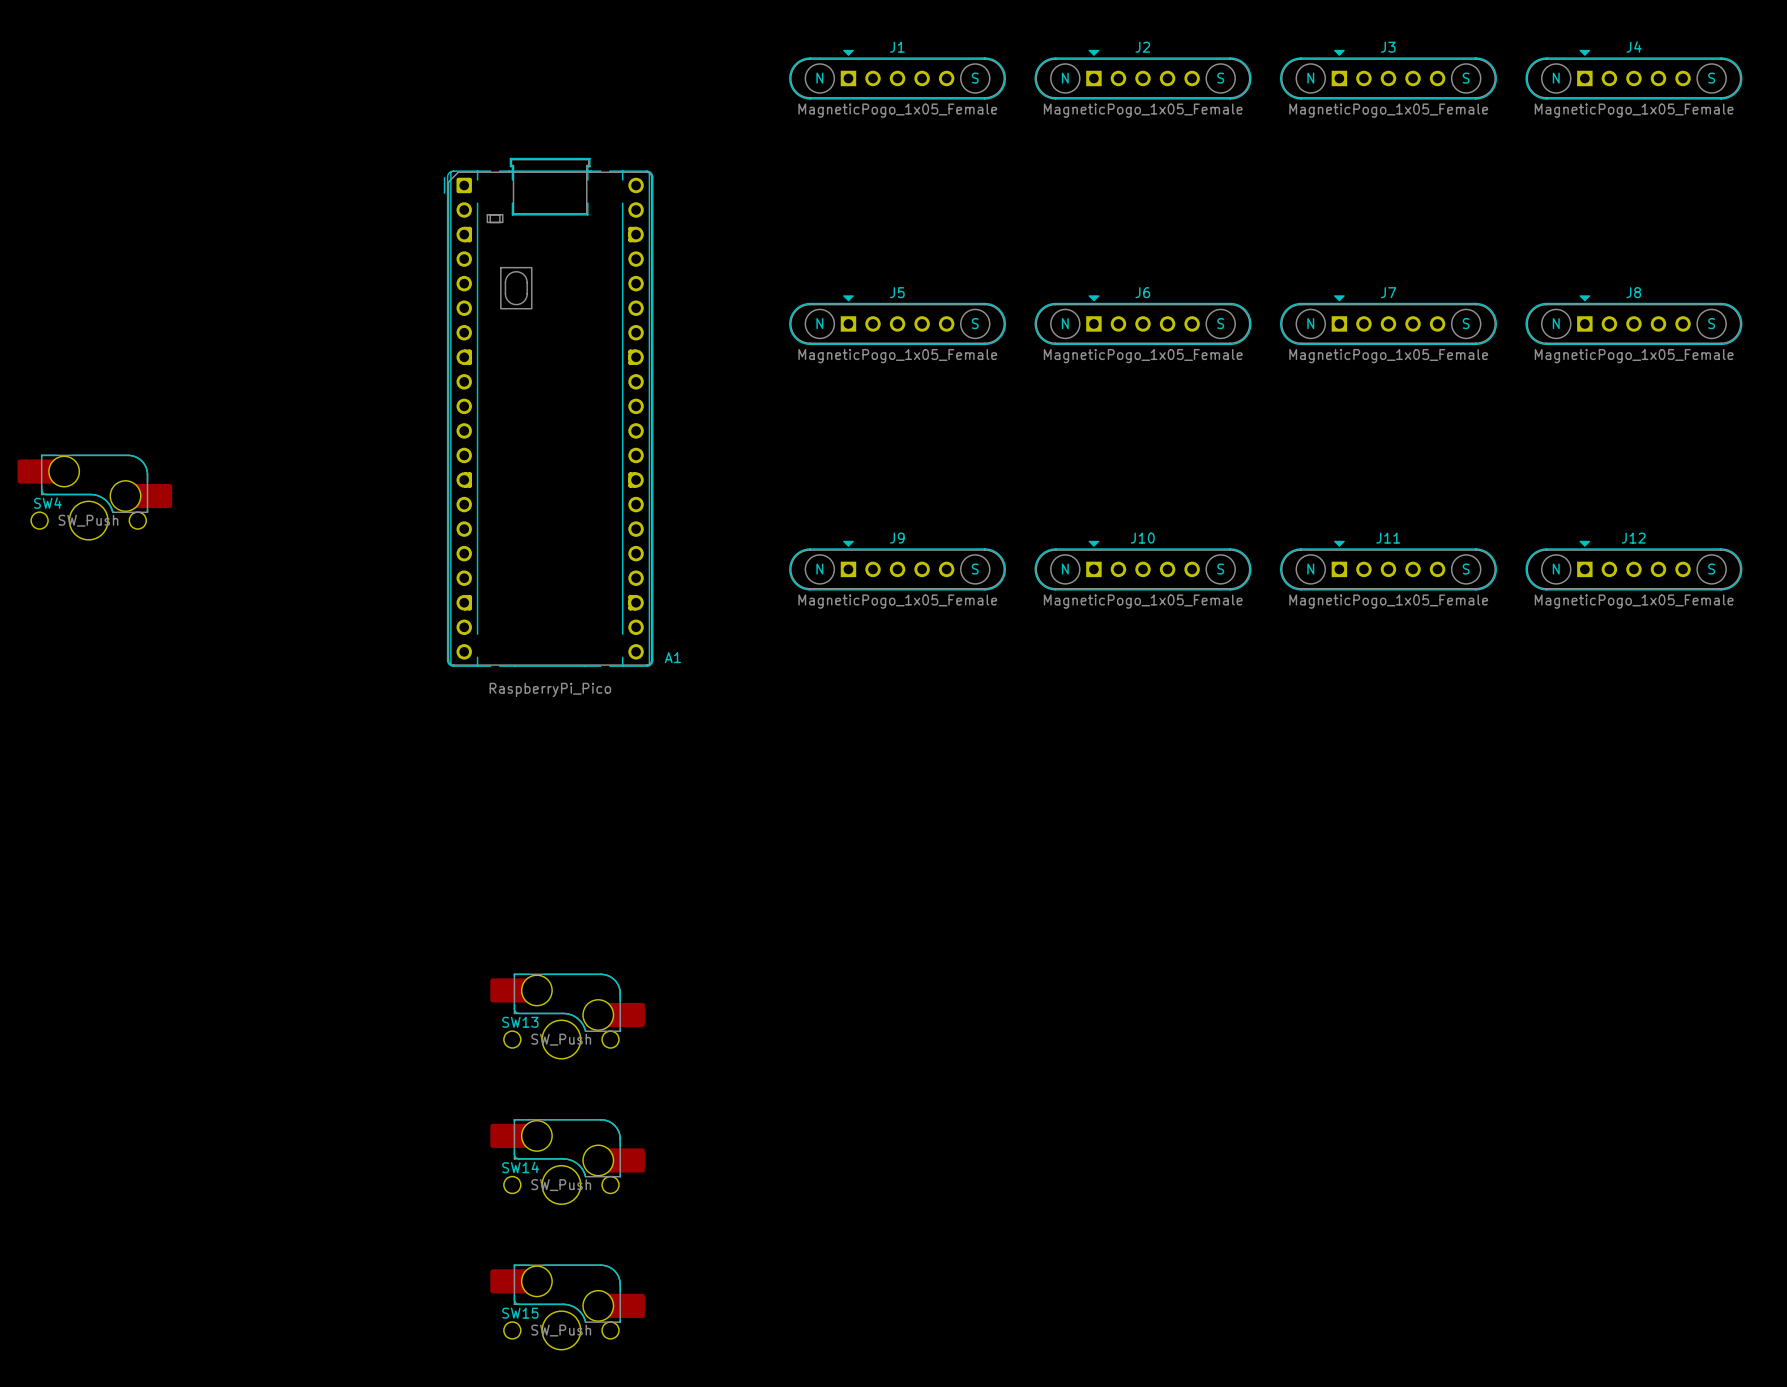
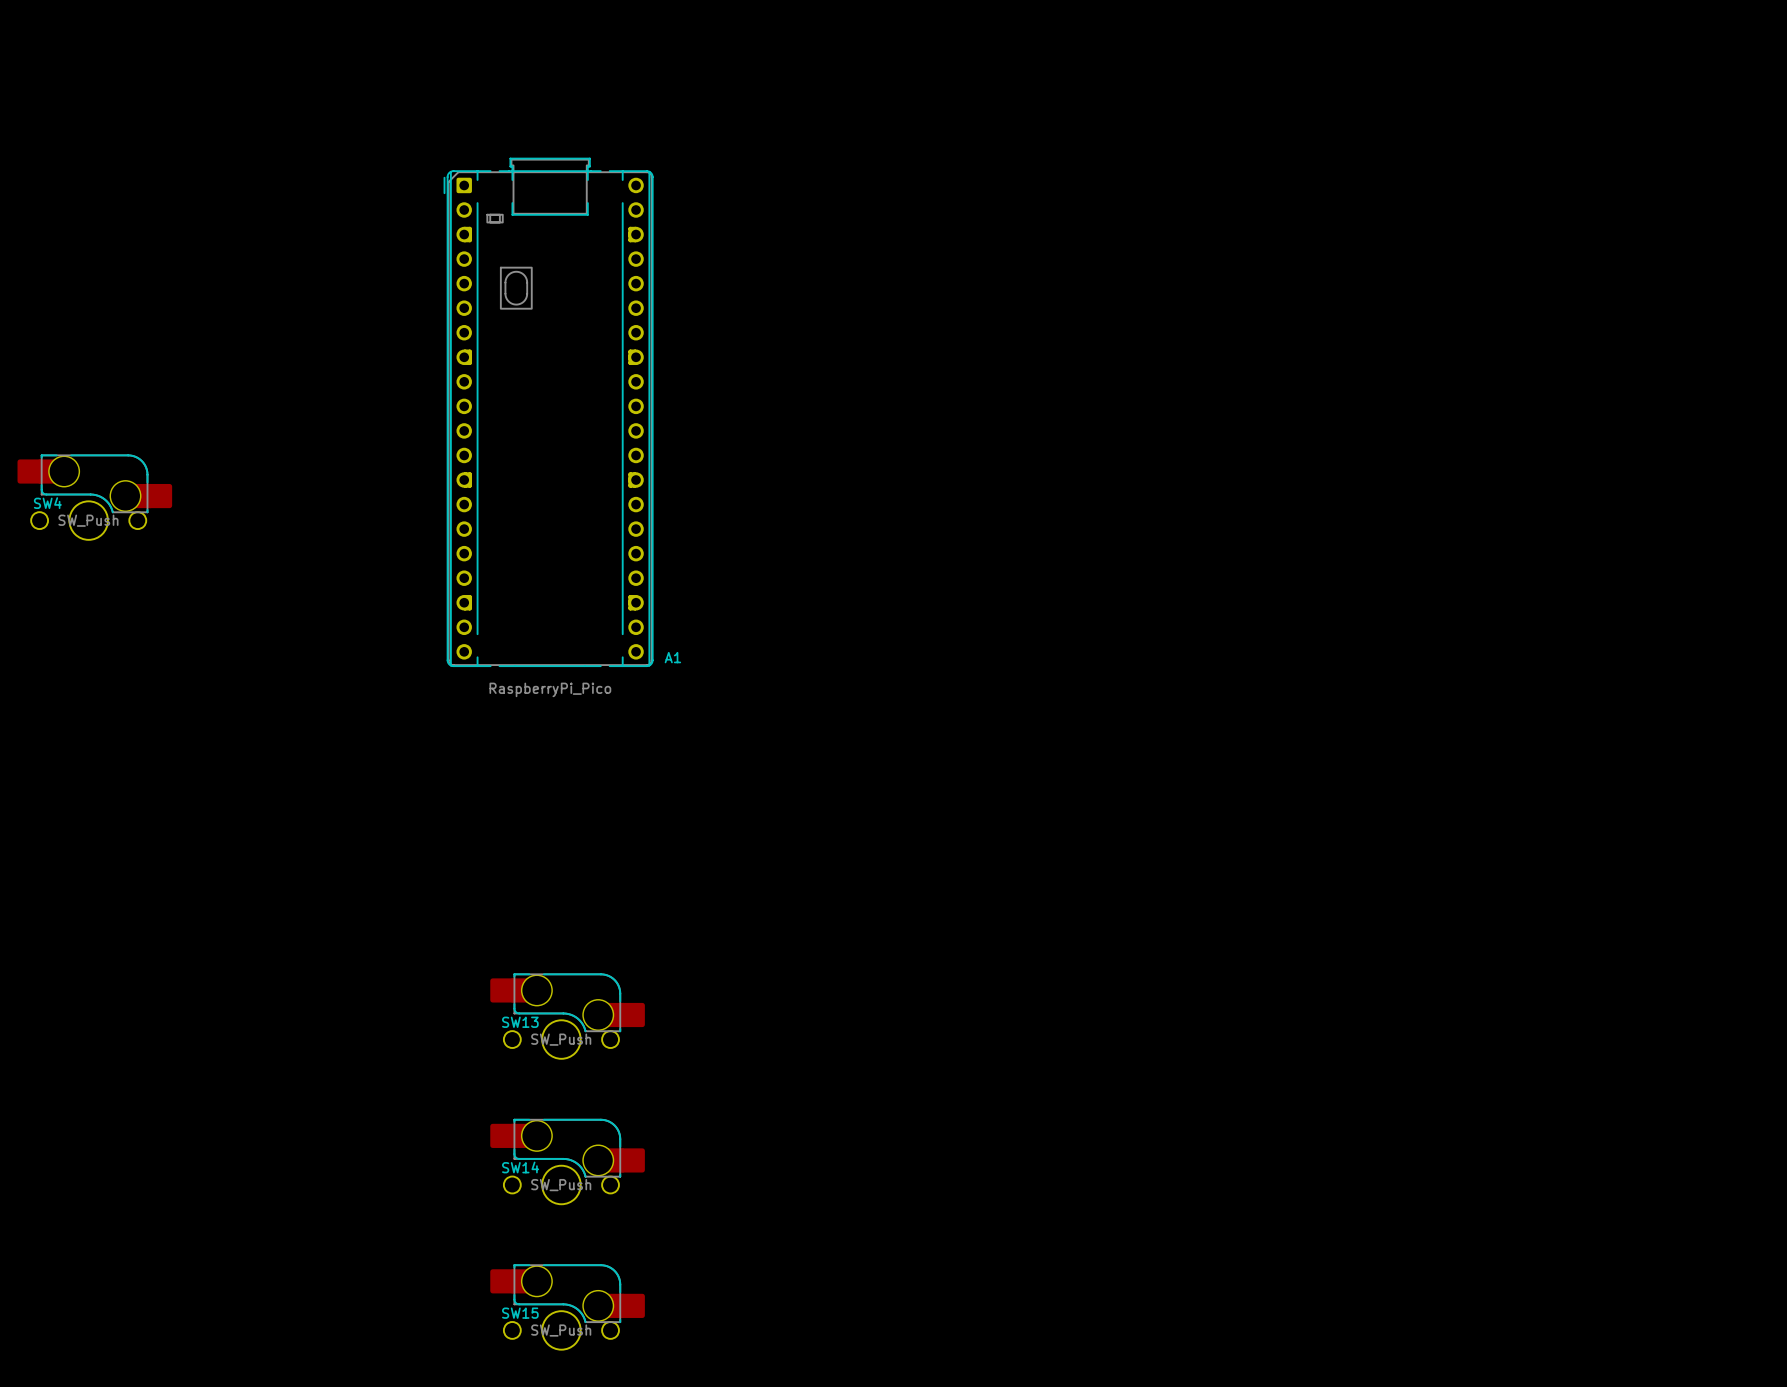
J1: MagneticPogo_1x05_Female (897, 74) -> none
J2: MagneticPogo_1x05_Female (1143, 74) -> none
J3: MagneticPogo_1x05_Female (1388, 74) -> none
J4: MagneticPogo_1x05_Female (1633, 74) -> none
J5: MagneticPogo_1x05_Female (897, 320) -> none
J6: MagneticPogo_1x05_Female (1143, 320) -> none
J7: MagneticPogo_1x05_Female (1388, 320) -> none
J8: MagneticPogo_1x05_Female (1633, 320) -> none
J9: MagneticPogo_1x05_Female (897, 565) -> none
J10: MagneticPogo_1x05_Female (1143, 565) -> none
J11: MagneticPogo_1x05_Female (1388, 565) -> none
J12: MagneticPogo_1x05_Female (1633, 565) -> none

